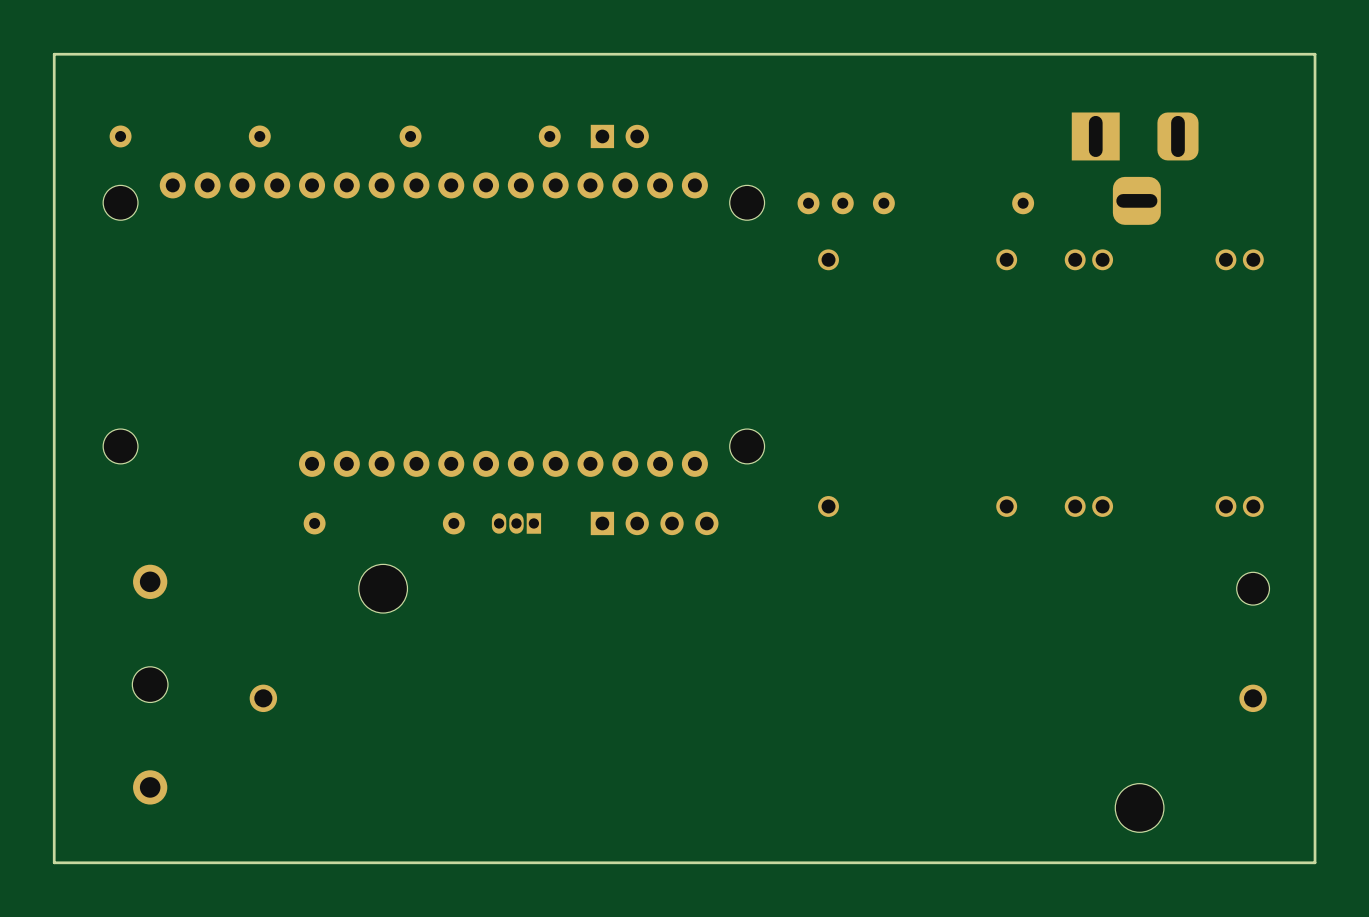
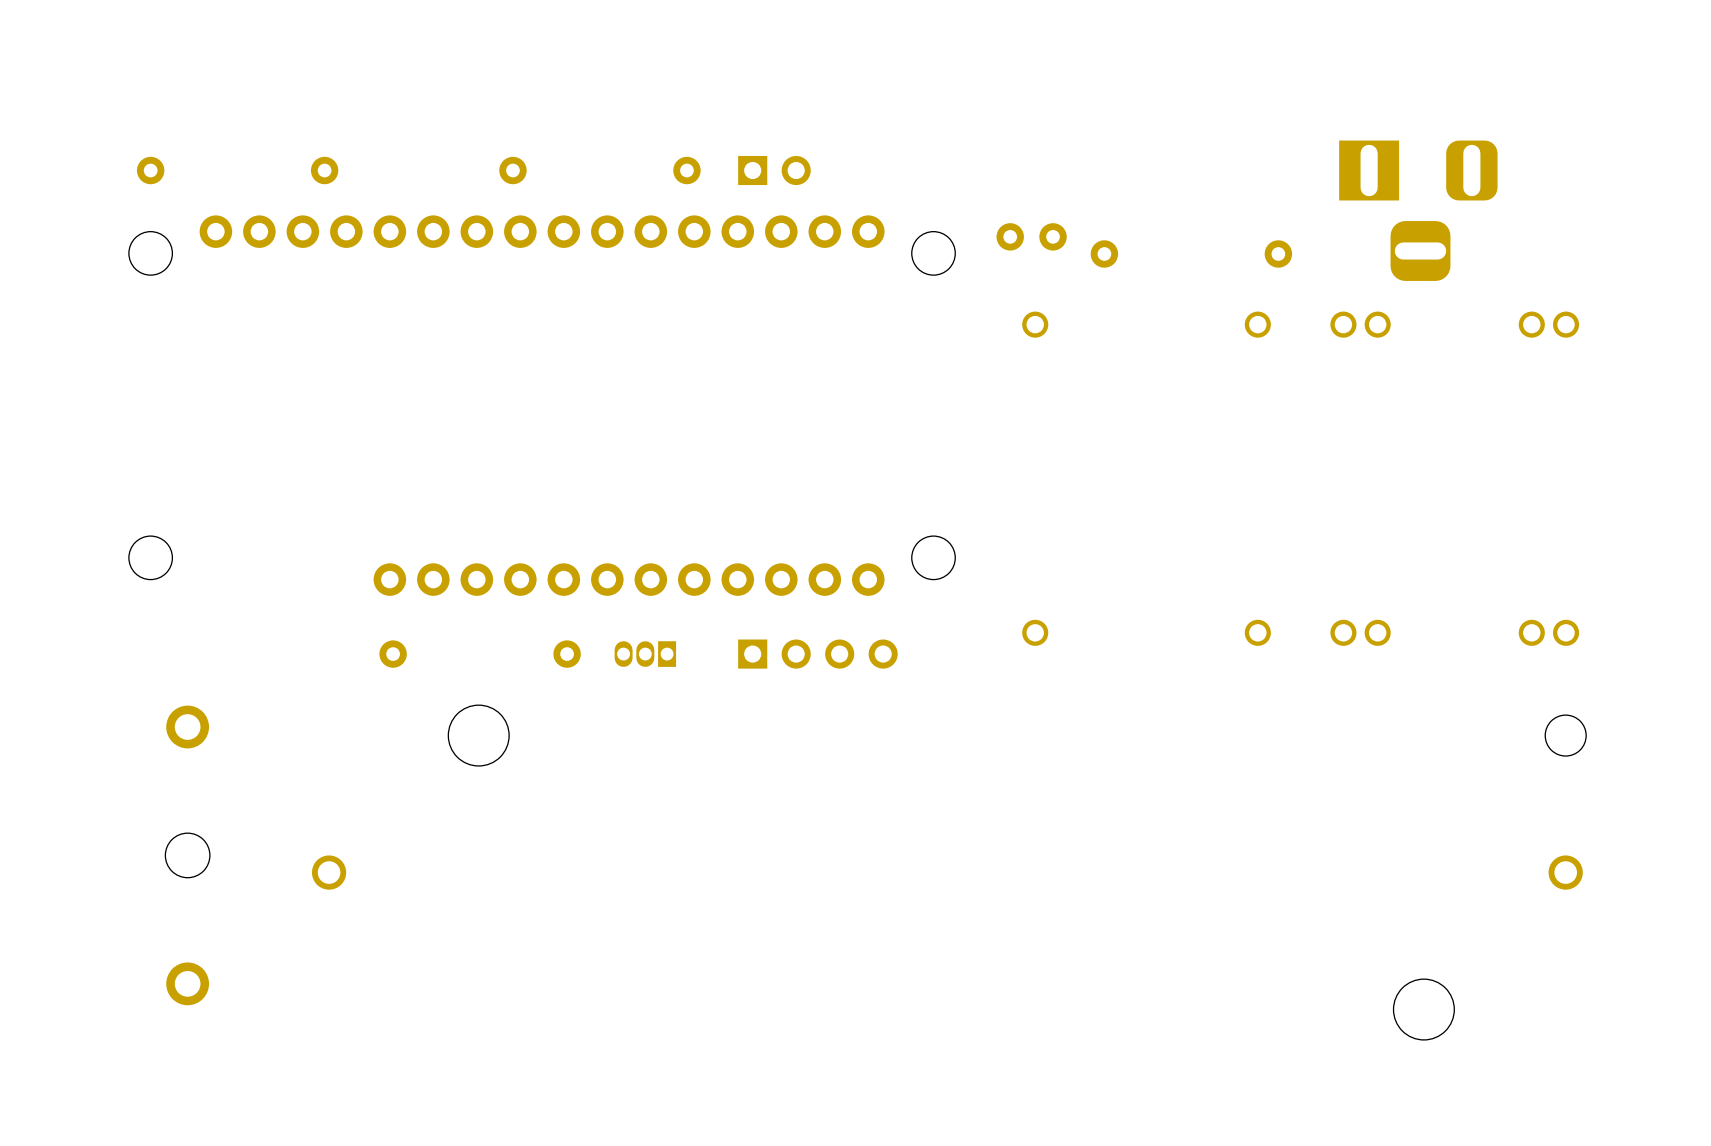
board edge: (1315, 54) (1315, 862) (54, 862) (54, 54) (1315, 54) -> none
part position: (825, 203) -> (1031, 236)

